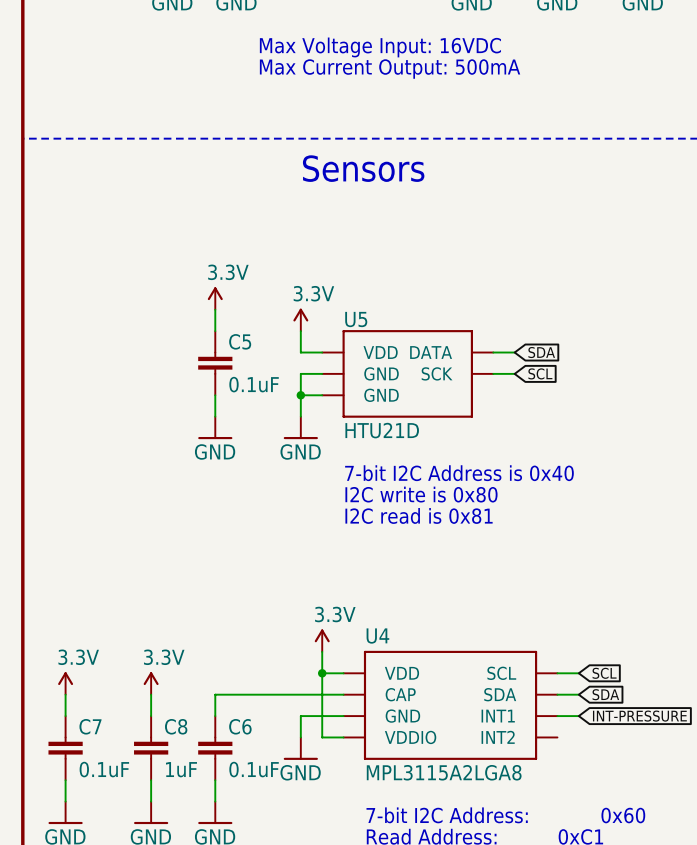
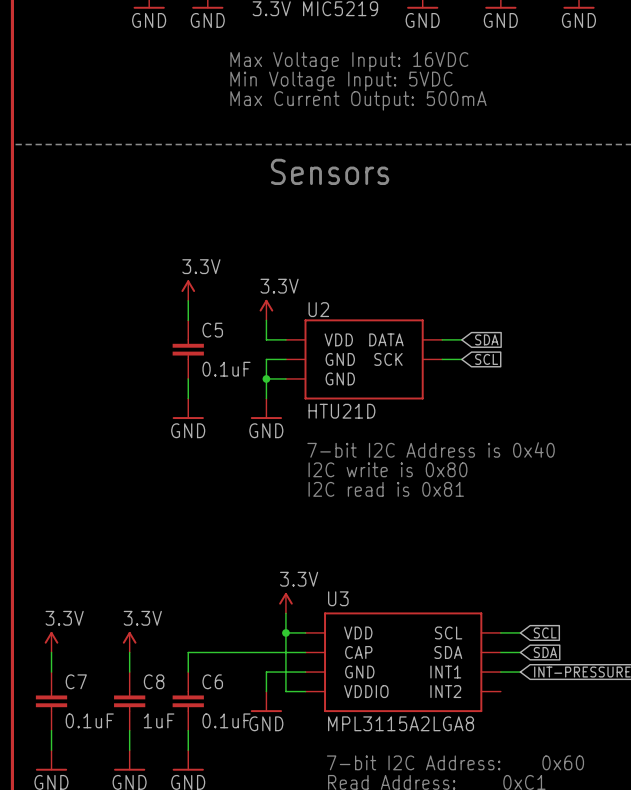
text: Max Current Output: 500mA (390, 69) -> Min Voltage Input: 5VDC (341, 81)
text: none -> Max Current Output: 500mA (358, 100)
U5 name: U5 (356, 319) -> U2 (318, 309)
U4 name: U4 (377, 636) -> U3 (338, 598)

